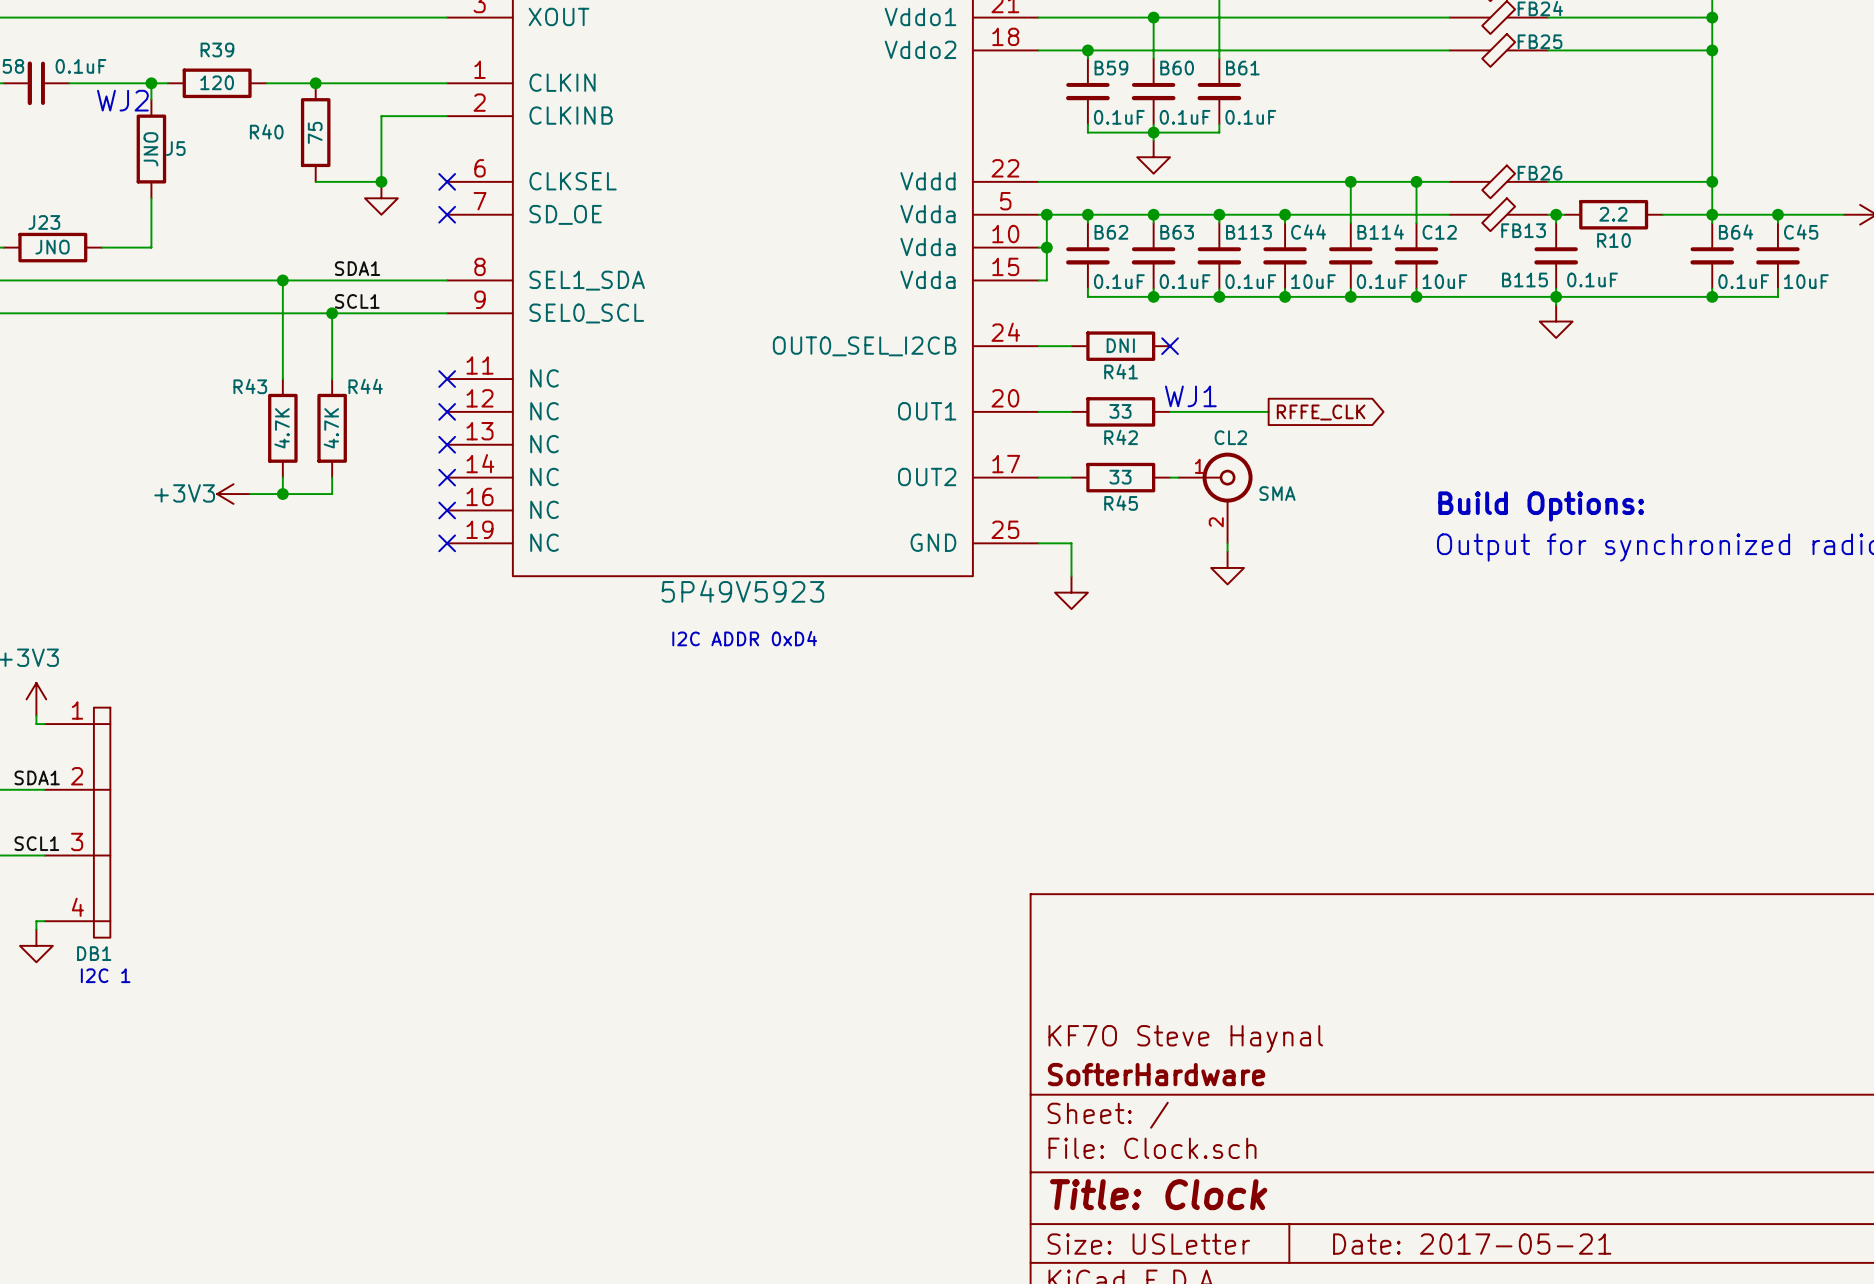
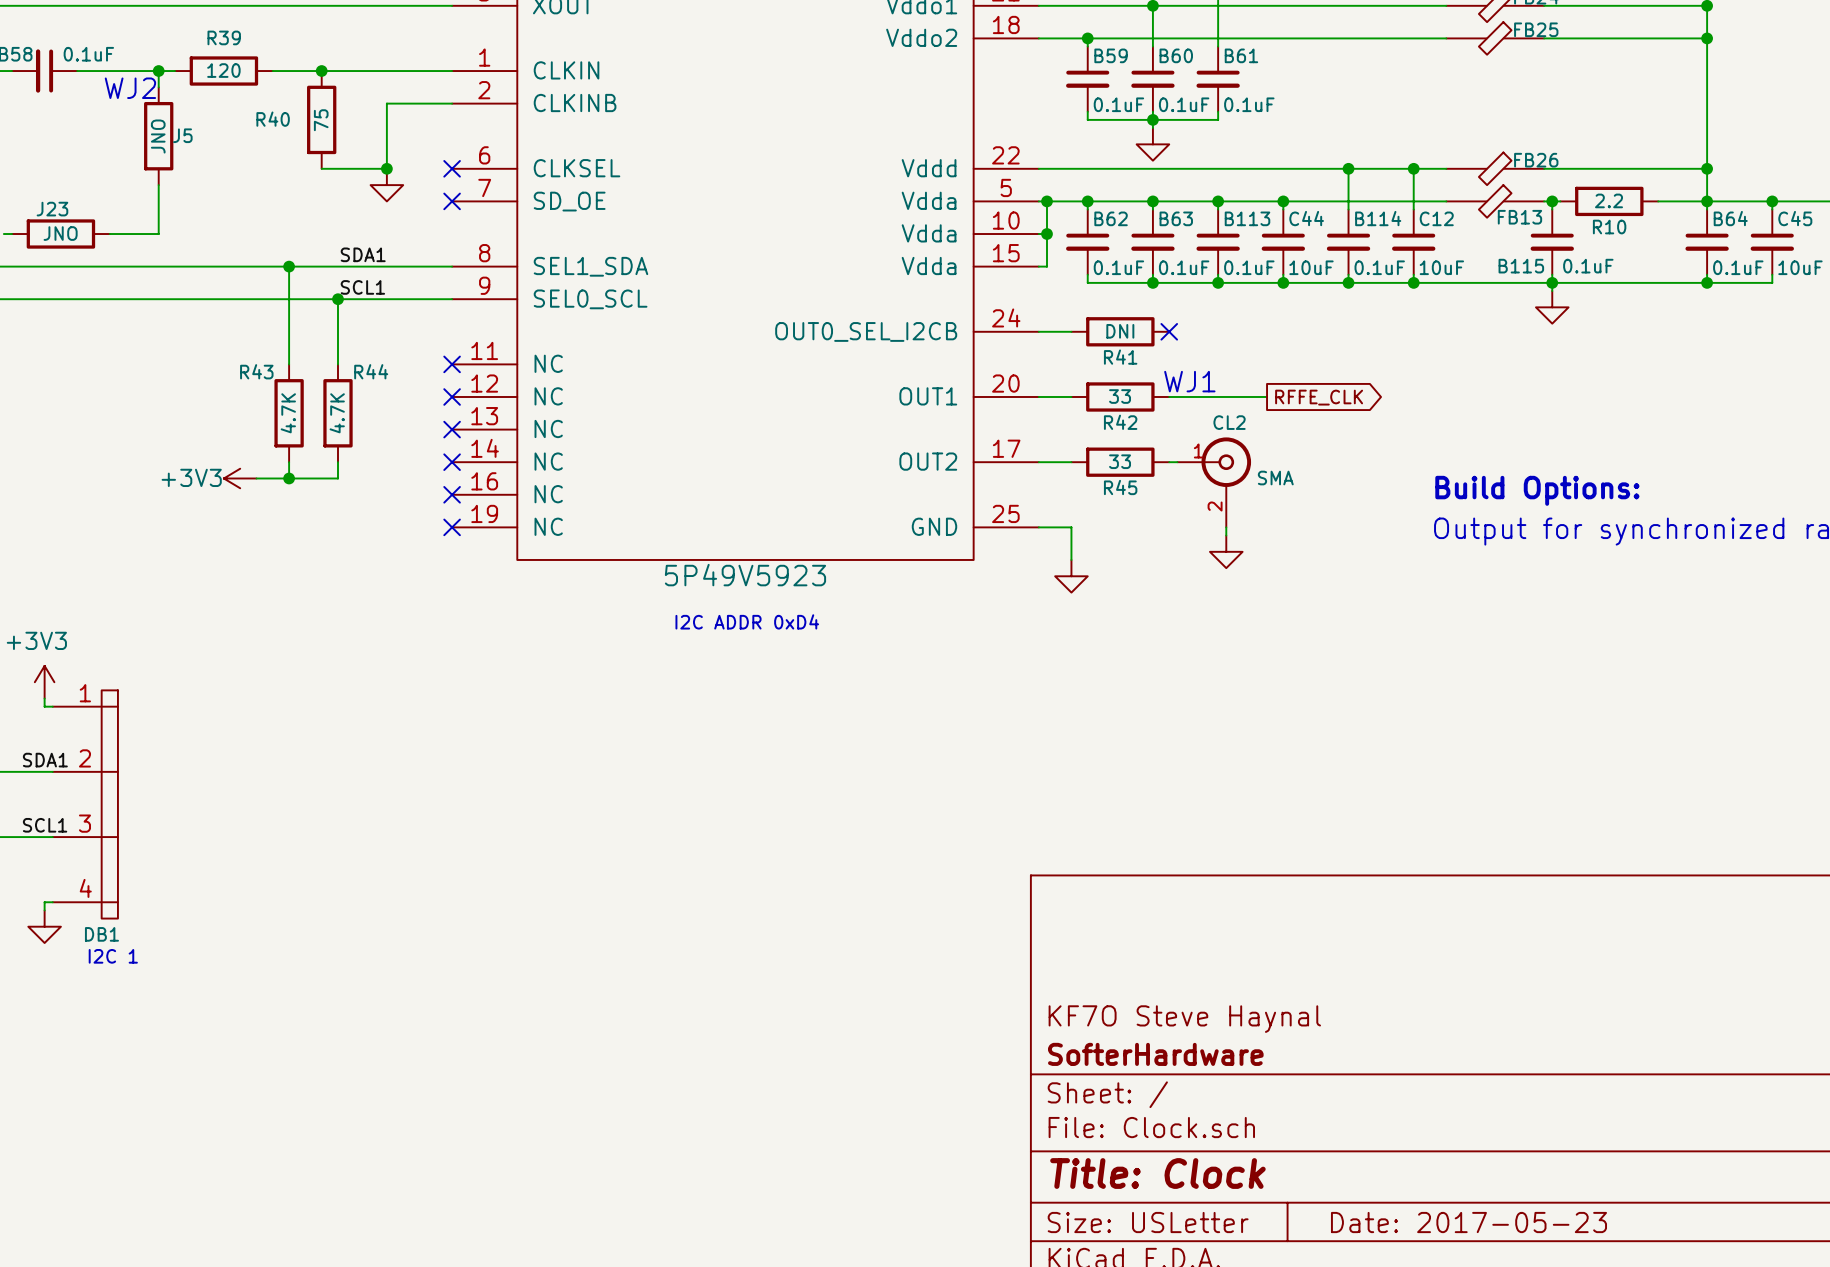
title block: Date: 2017-05-21 (1472, 1244) -> Date: 2017-05-23 (1468, 1222)

